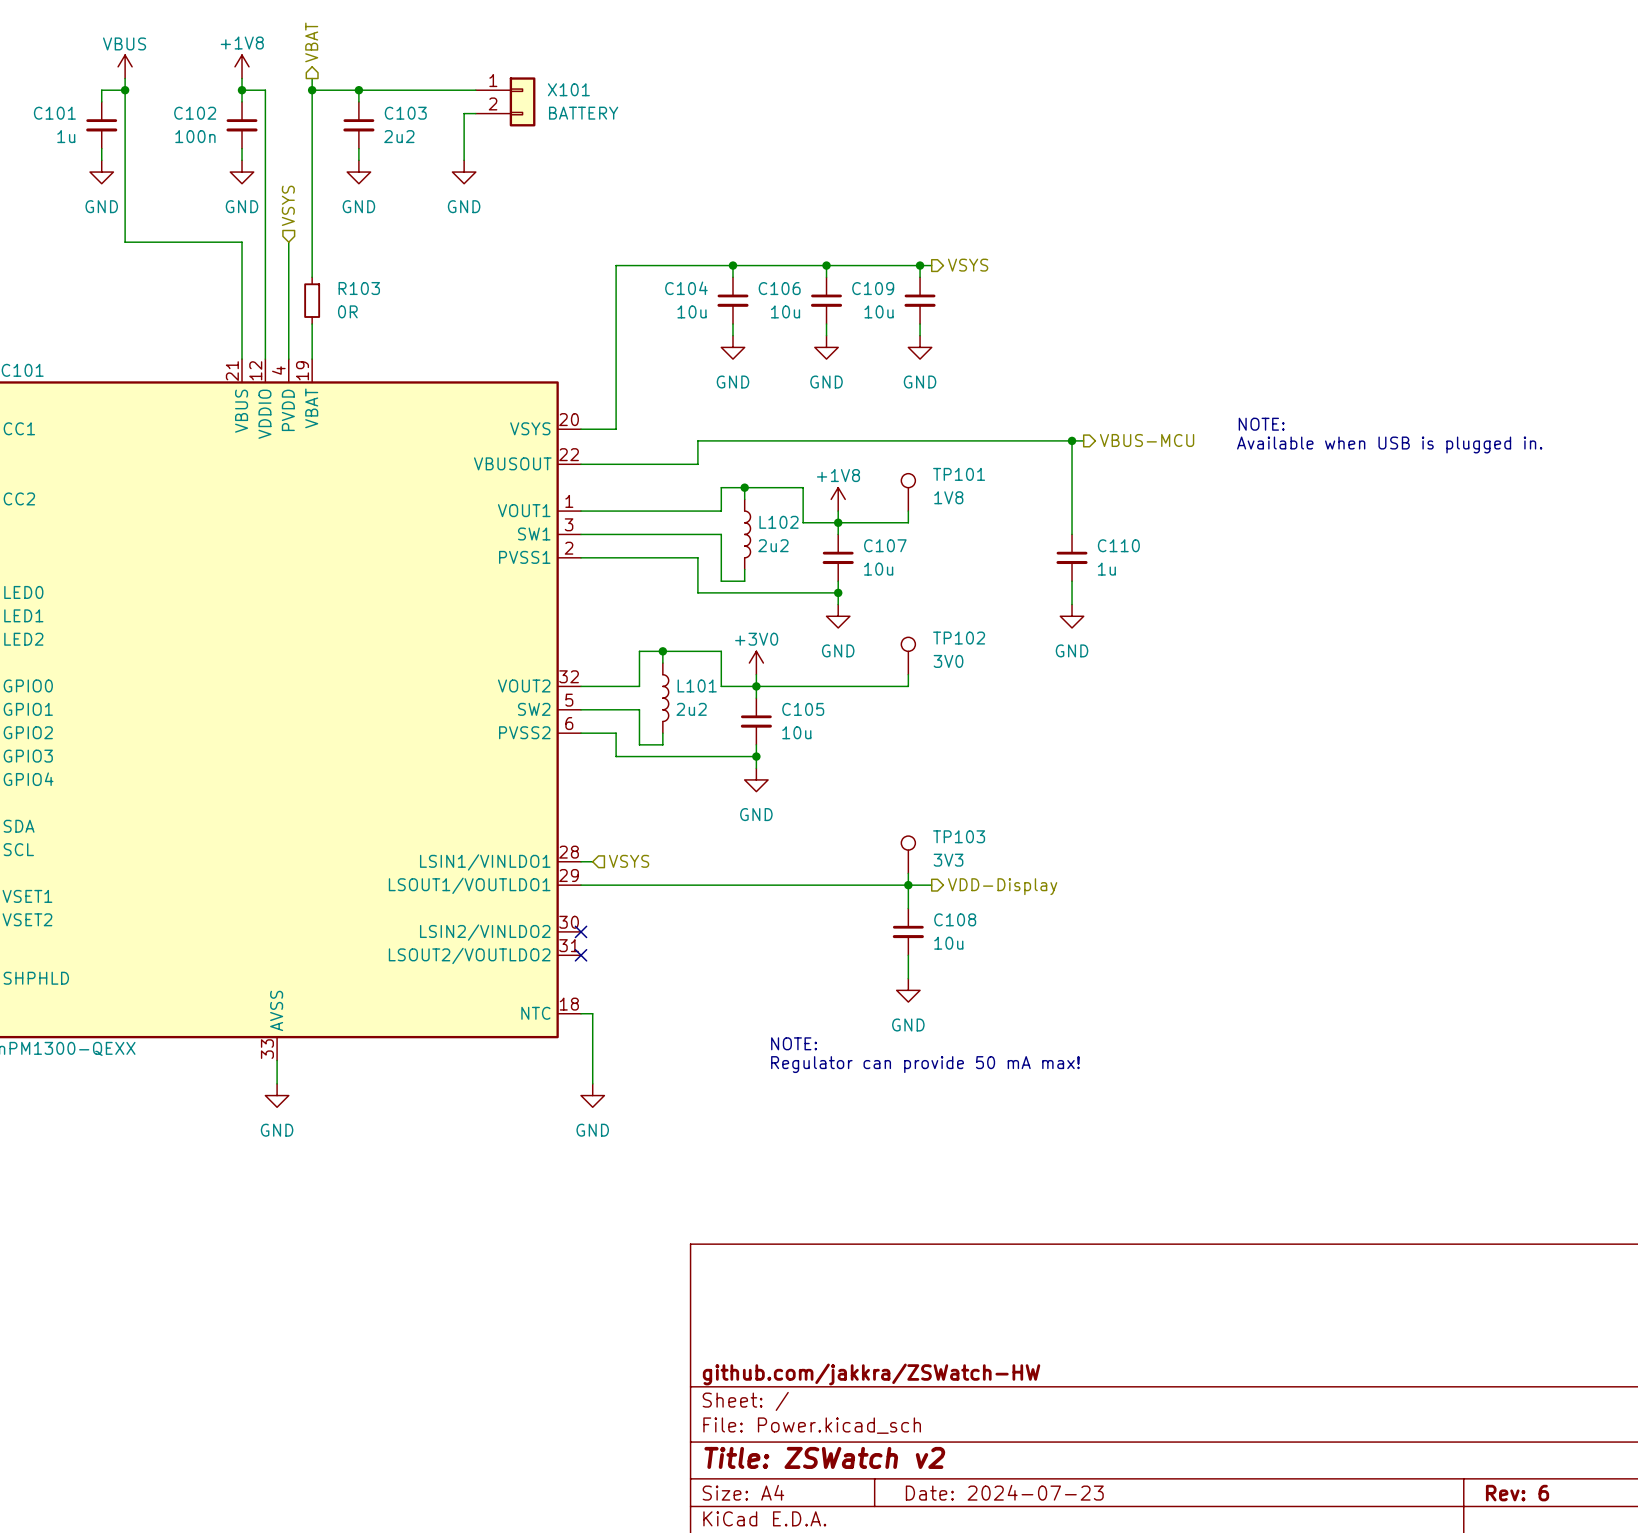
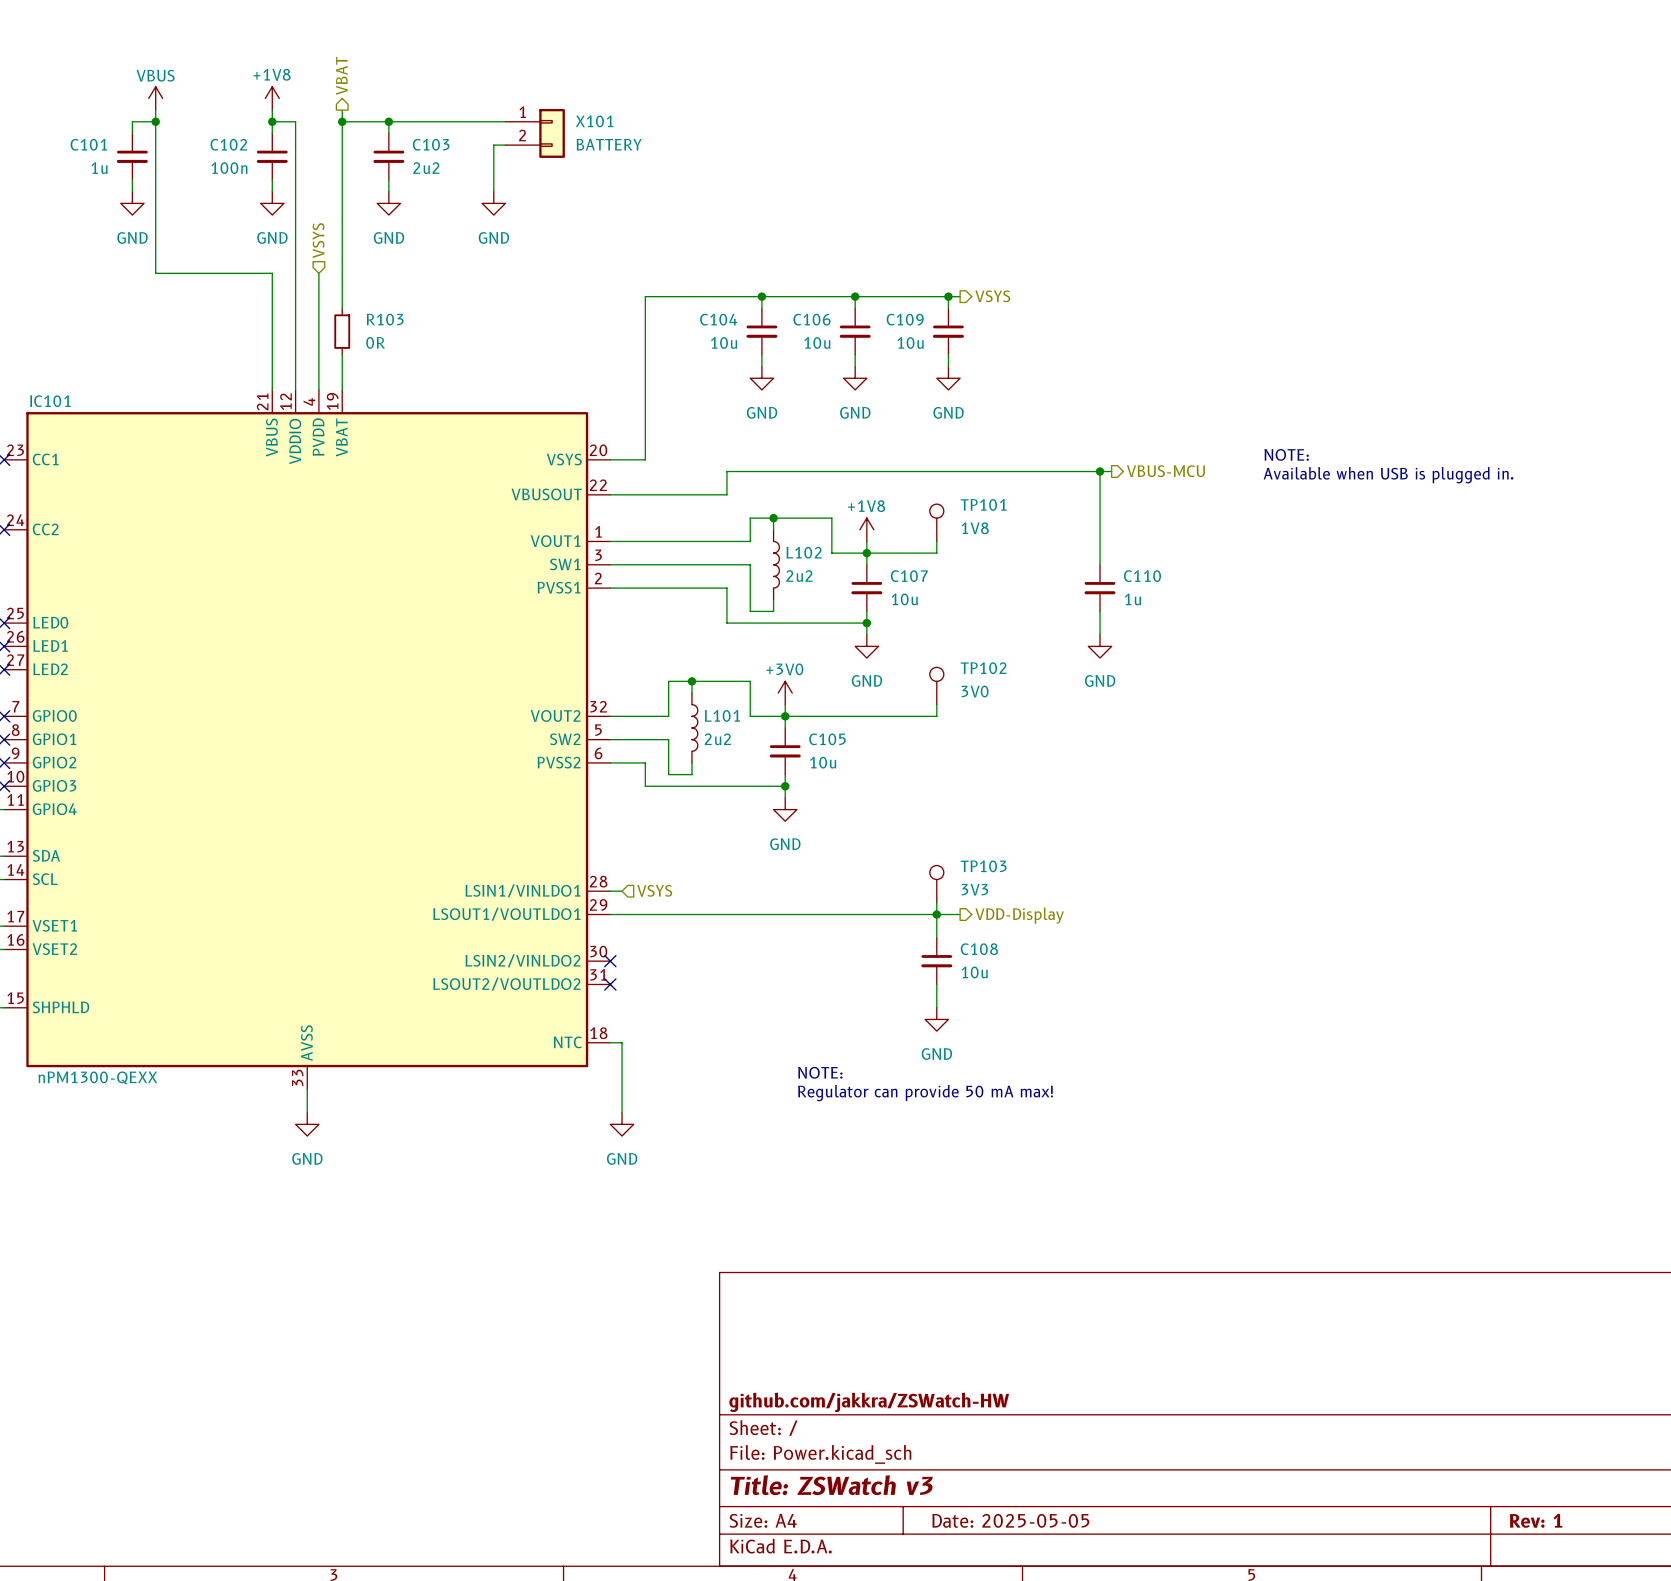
title block: Title: ZSWatch v2 (824, 1457) -> Title: ZSWatch v3 (831, 1485)
title block: Date: 2024-07-23 (1004, 1492) -> Date: 2025-05-05 (1010, 1520)
title block: Rev: 6 (1517, 1493) -> Rev: 1 (1536, 1520)

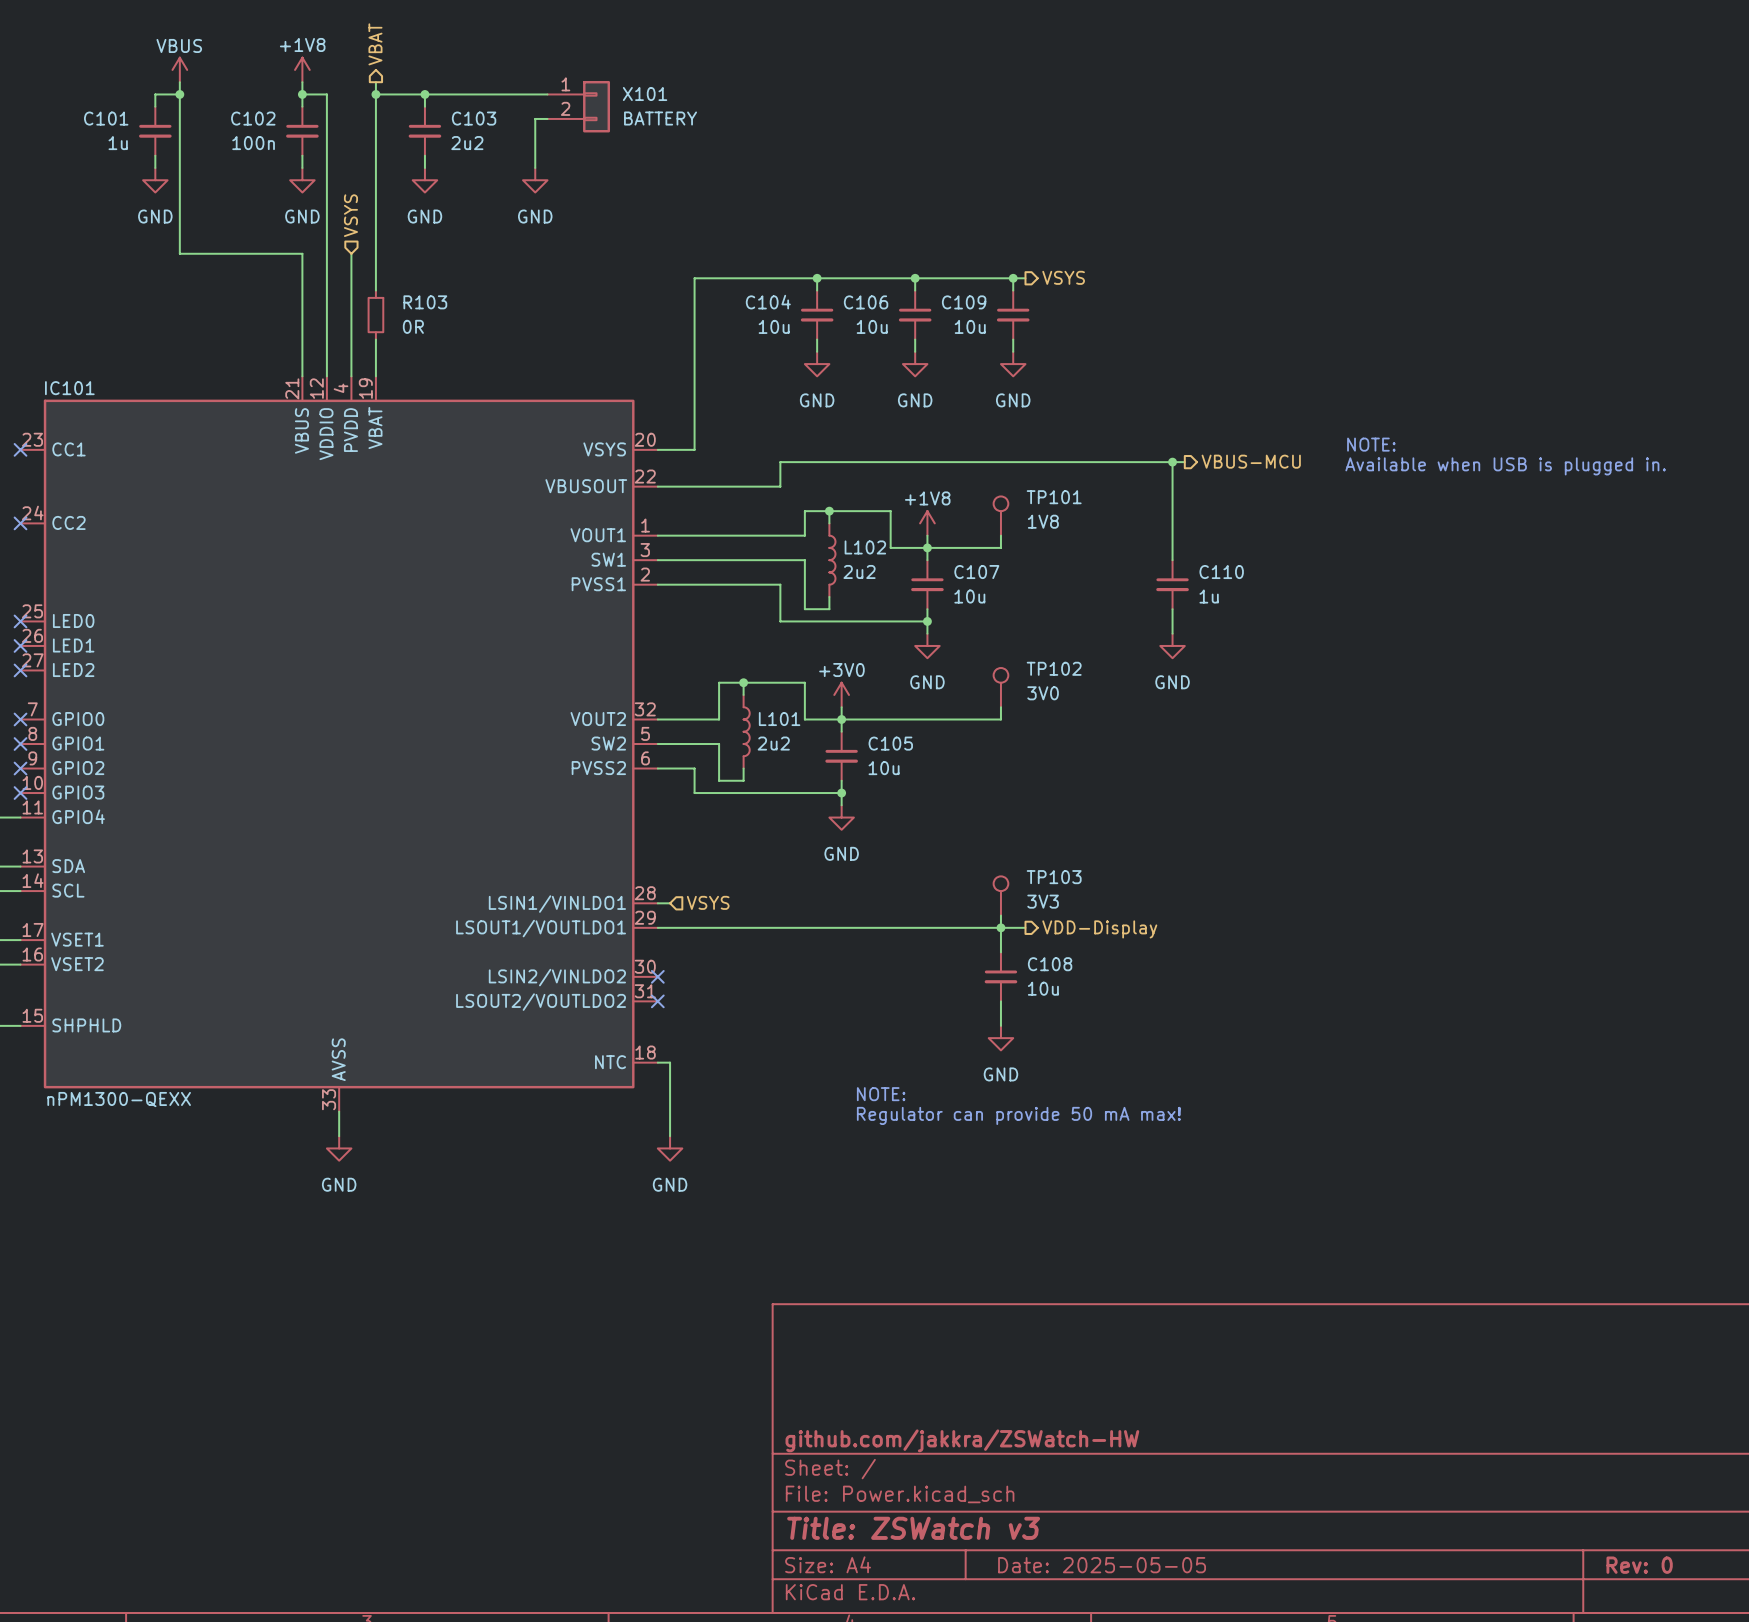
title block: Rev: 1 (1536, 1520) -> Rev: 0 (1639, 1565)

